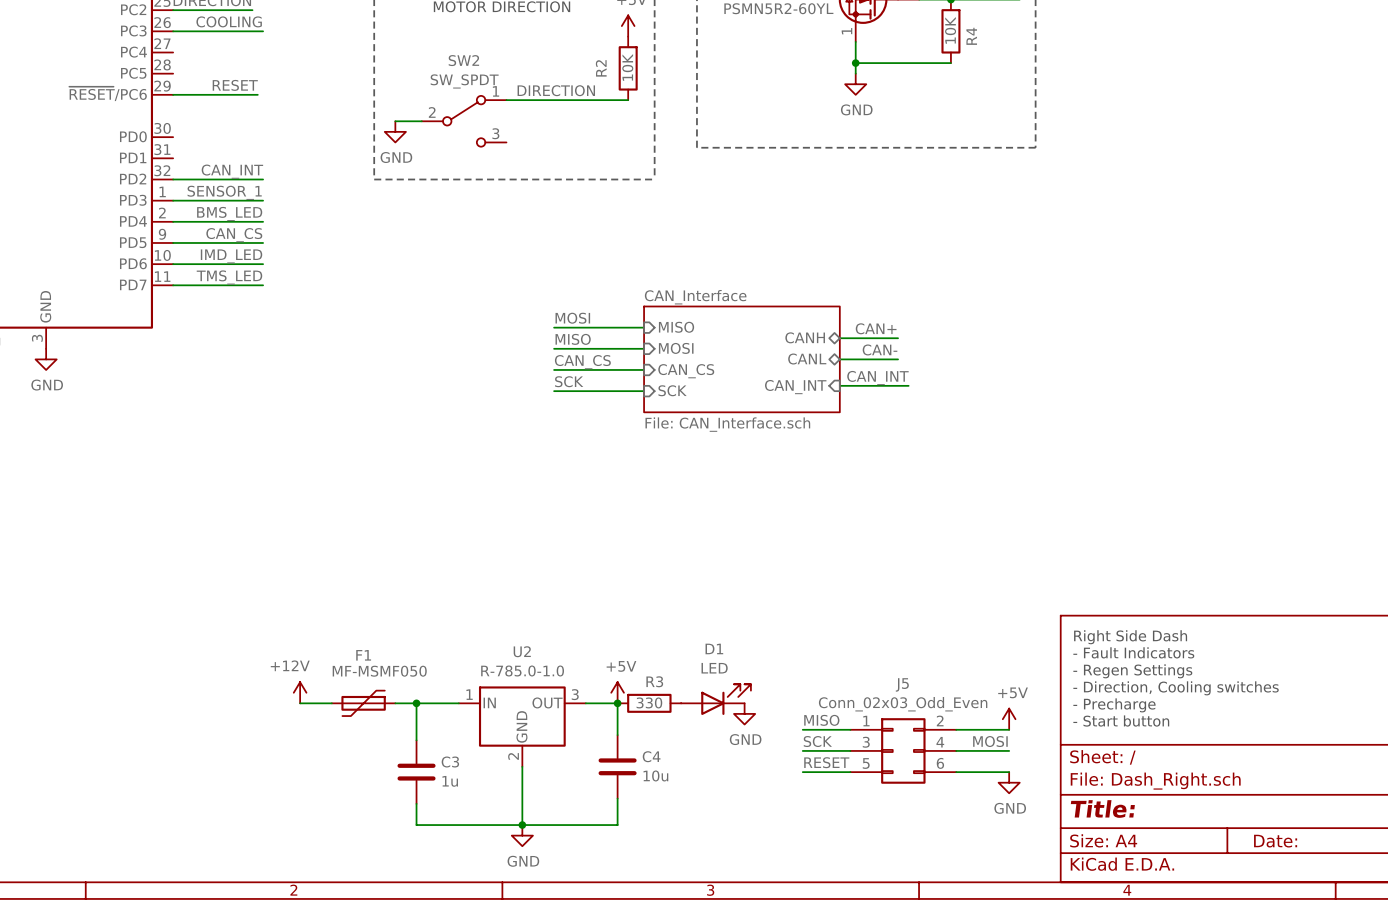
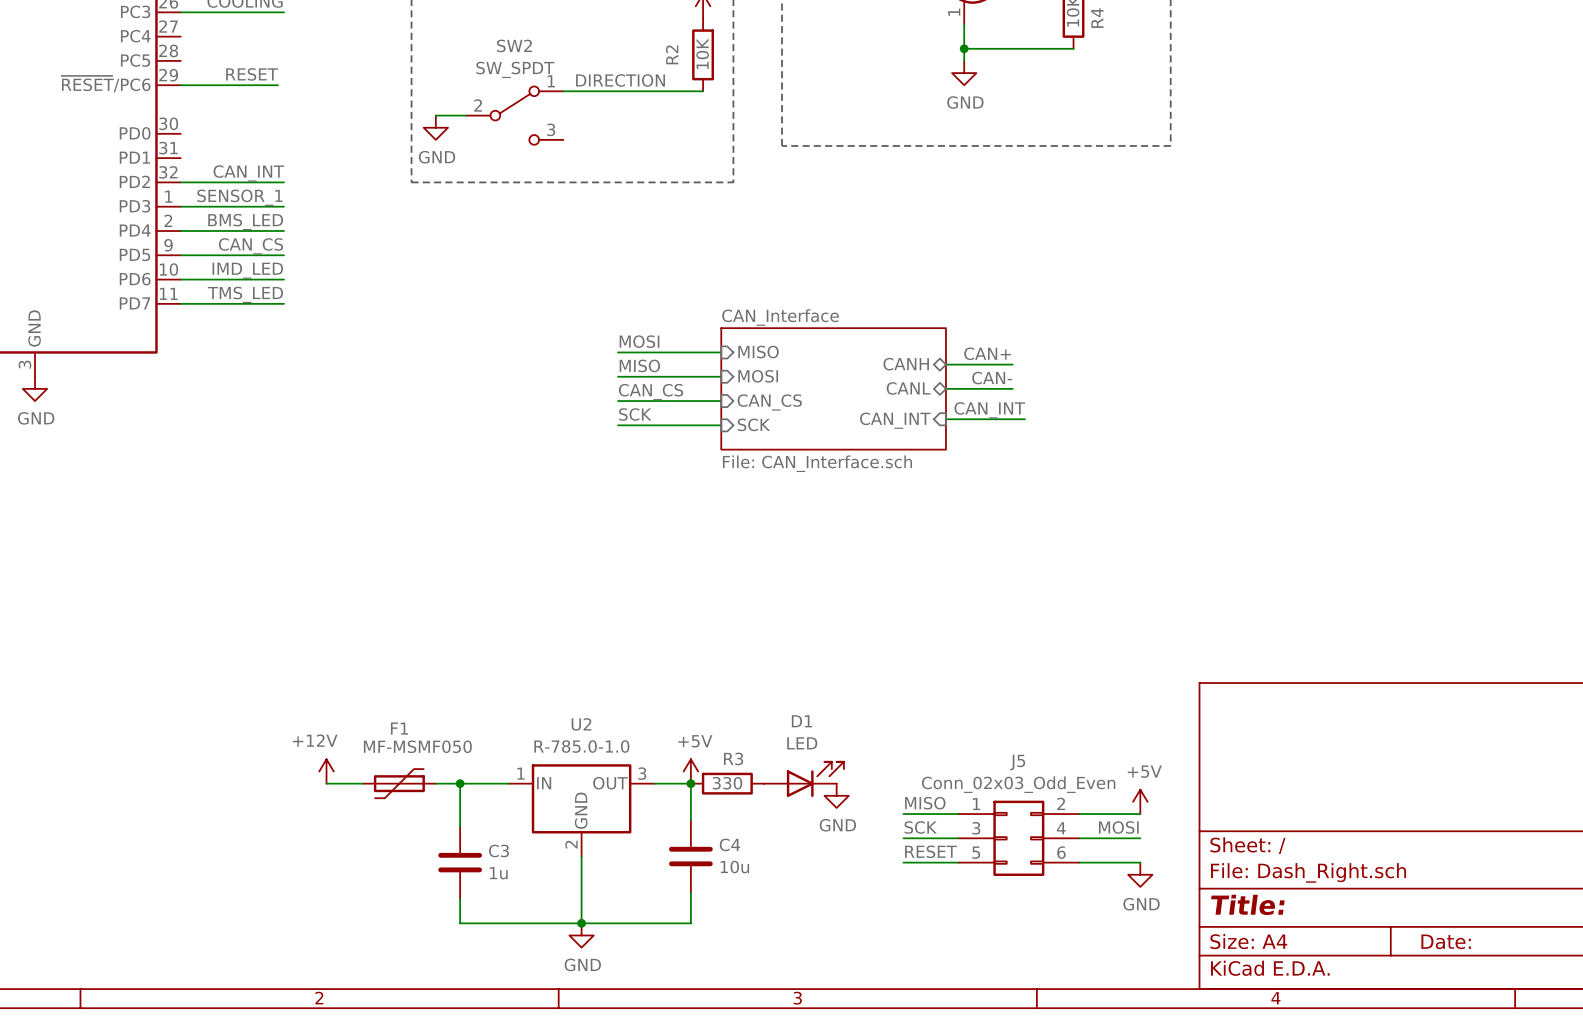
text: Right Side Dash (1130, 637) -> none
text: - Fault Indicators (1133, 652) -> none
text: - Regen Settings (1132, 671) -> none
text: - Direction, Cooling switches (1176, 688) -> none
text: - Precharge (1114, 705) -> none
text: - Start button (1121, 721) -> none

